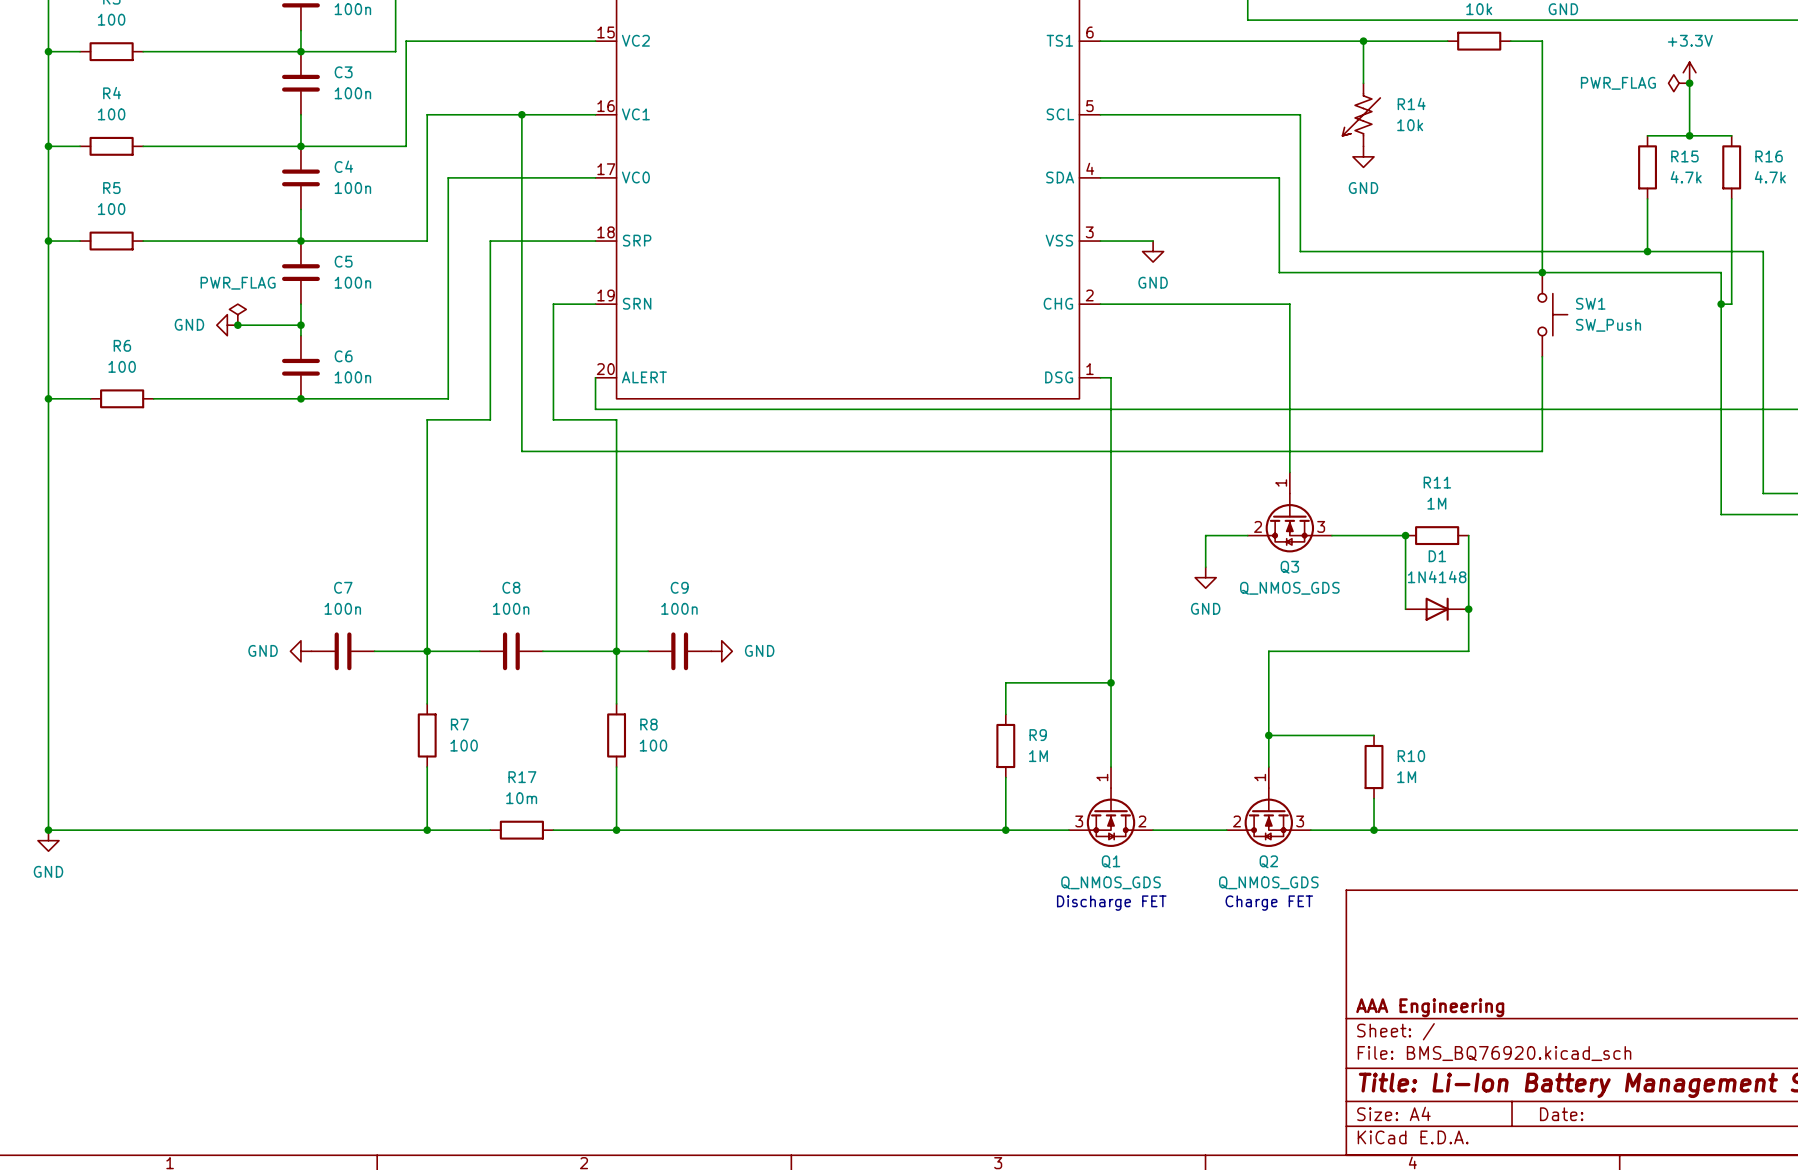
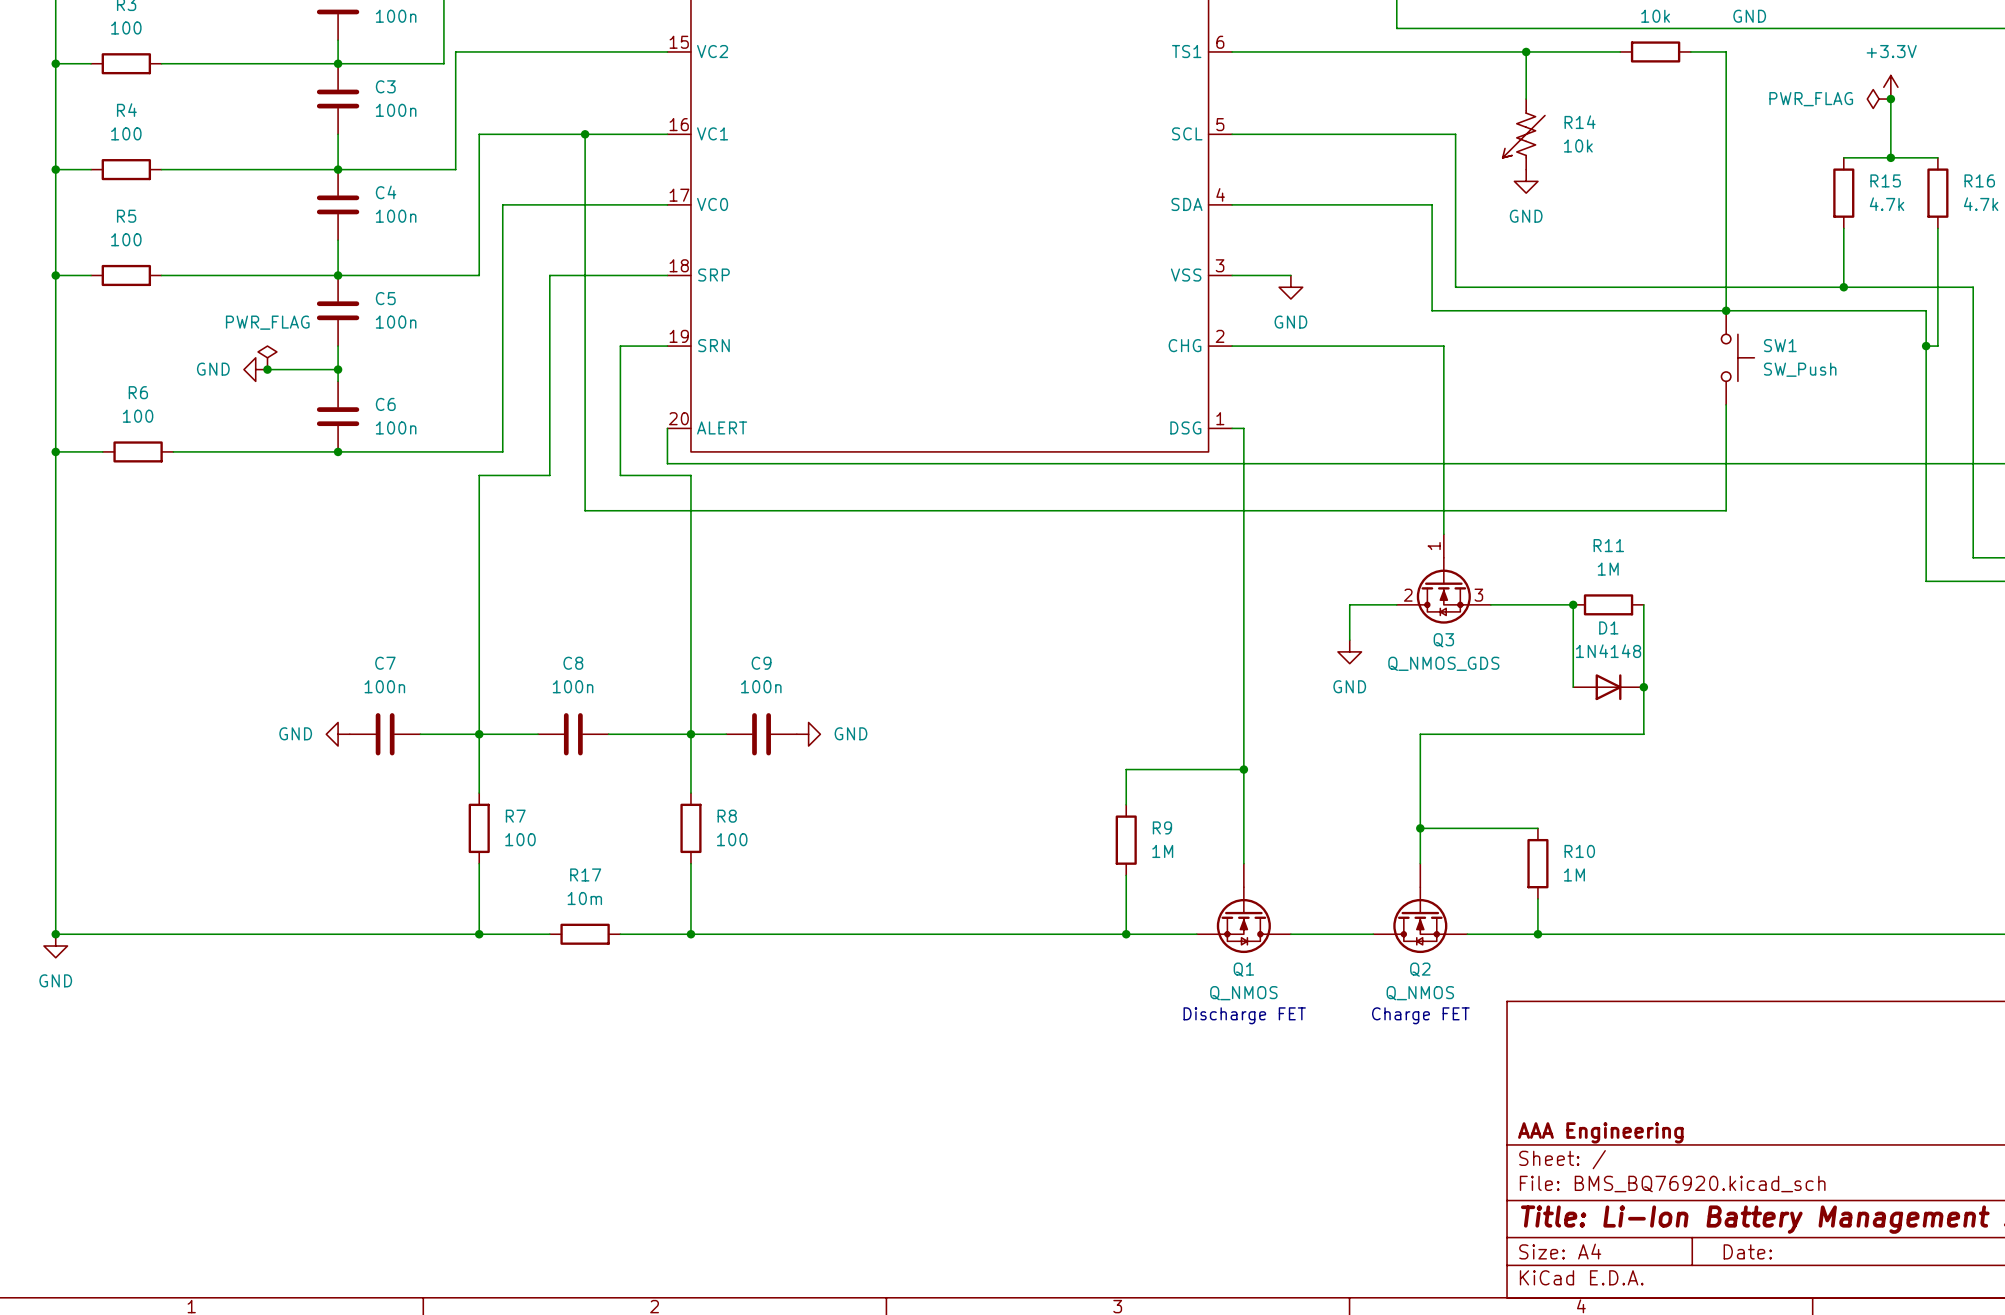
Q1 pin number: 1 (1102, 777) -> none
Q2 pin number: 1 (1260, 777) -> none
Q1 pin number: 3 (1079, 821) -> none
Q1 pin number: 2 (1142, 821) -> none
Q2 pin number: 2 (1237, 821) -> none
Q2 pin number: 3 (1300, 821) -> none
Q1 value: Q_NMOS_GDS (1111, 882) -> Q_NMOS (1243, 993)
Q2 value: Q_NMOS_GDS (1268, 882) -> Q_NMOS (1420, 993)

